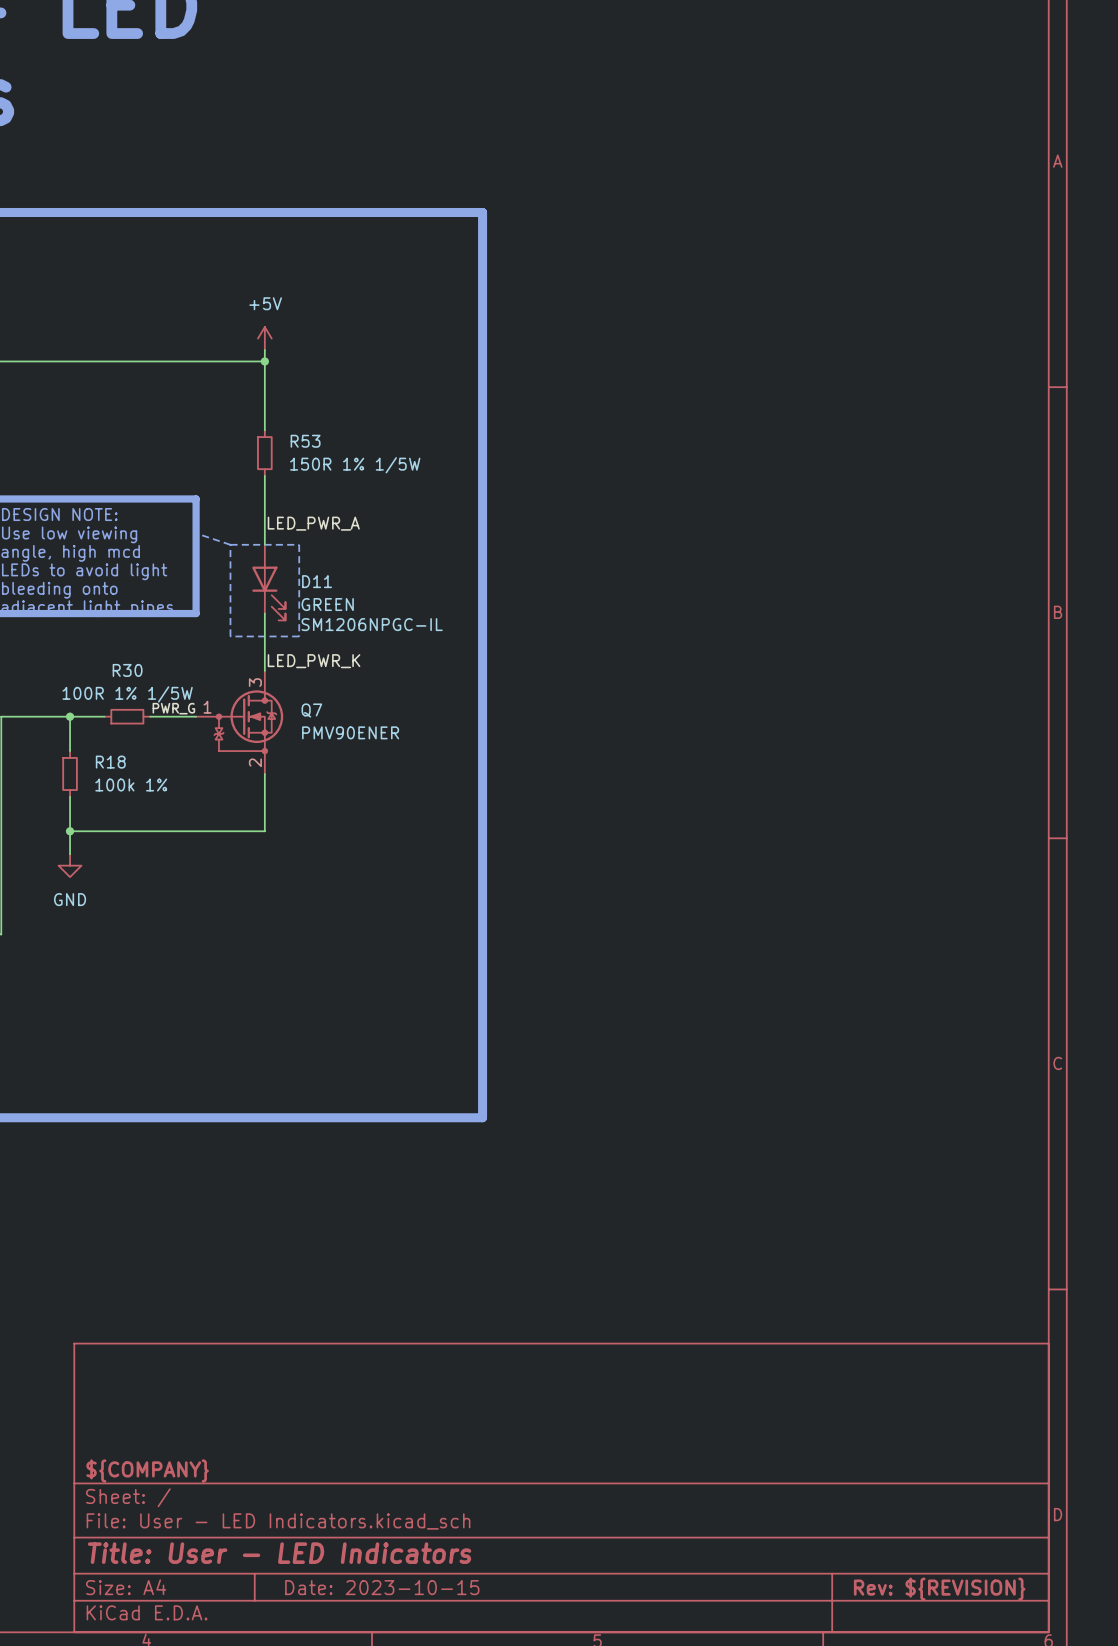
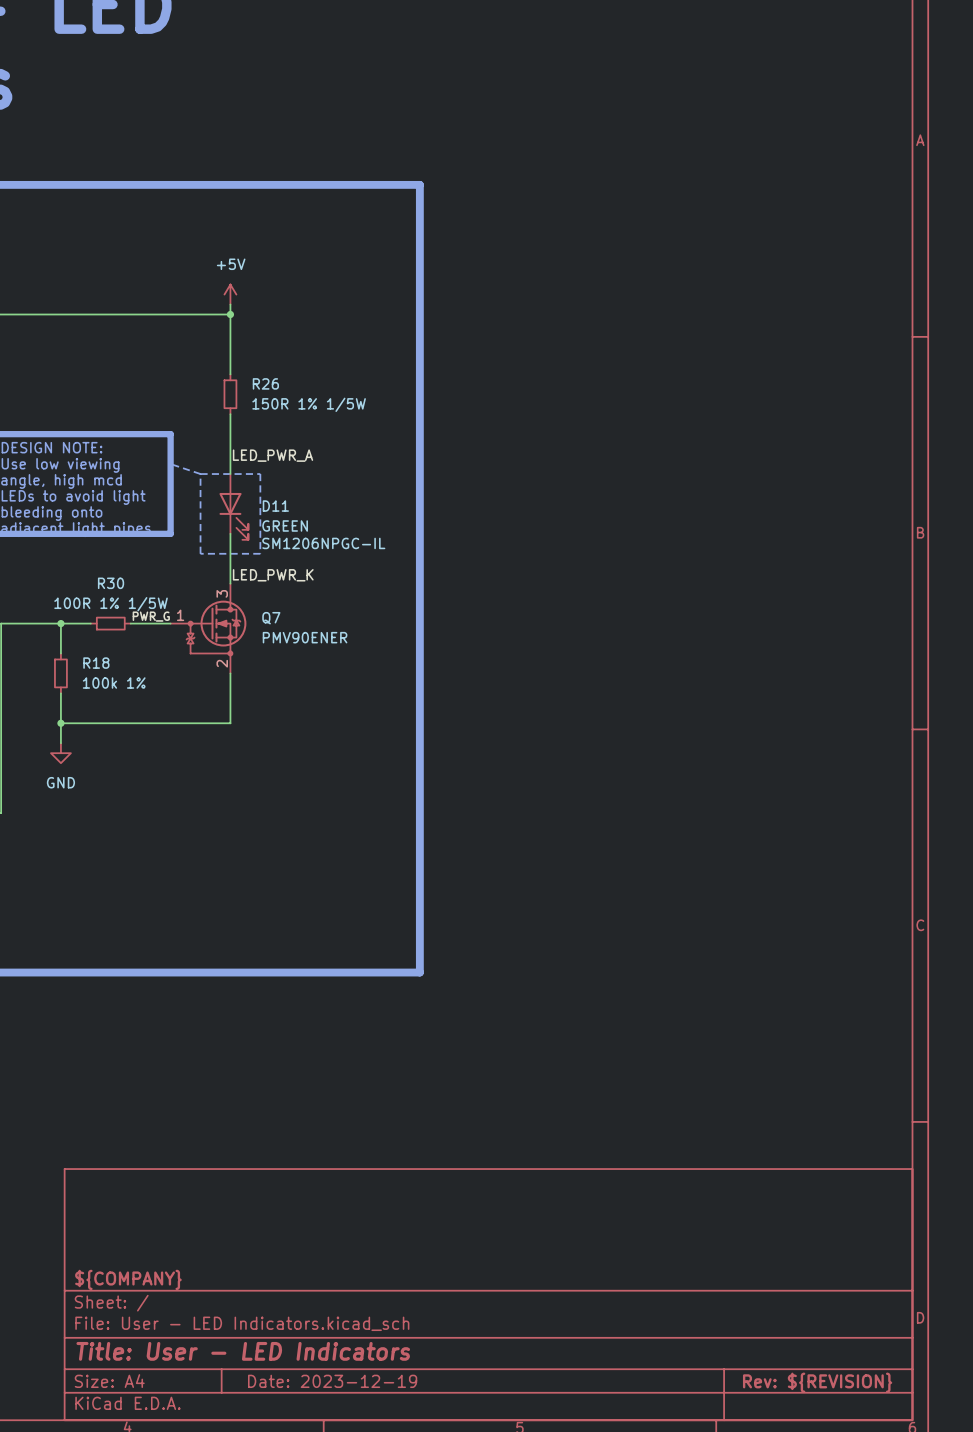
R53 name: R53 (305, 441) -> R26 (265, 383)
title block: Date: 2023-10-15 (382, 1587) -> Date: 2023-12-19 (332, 1381)

